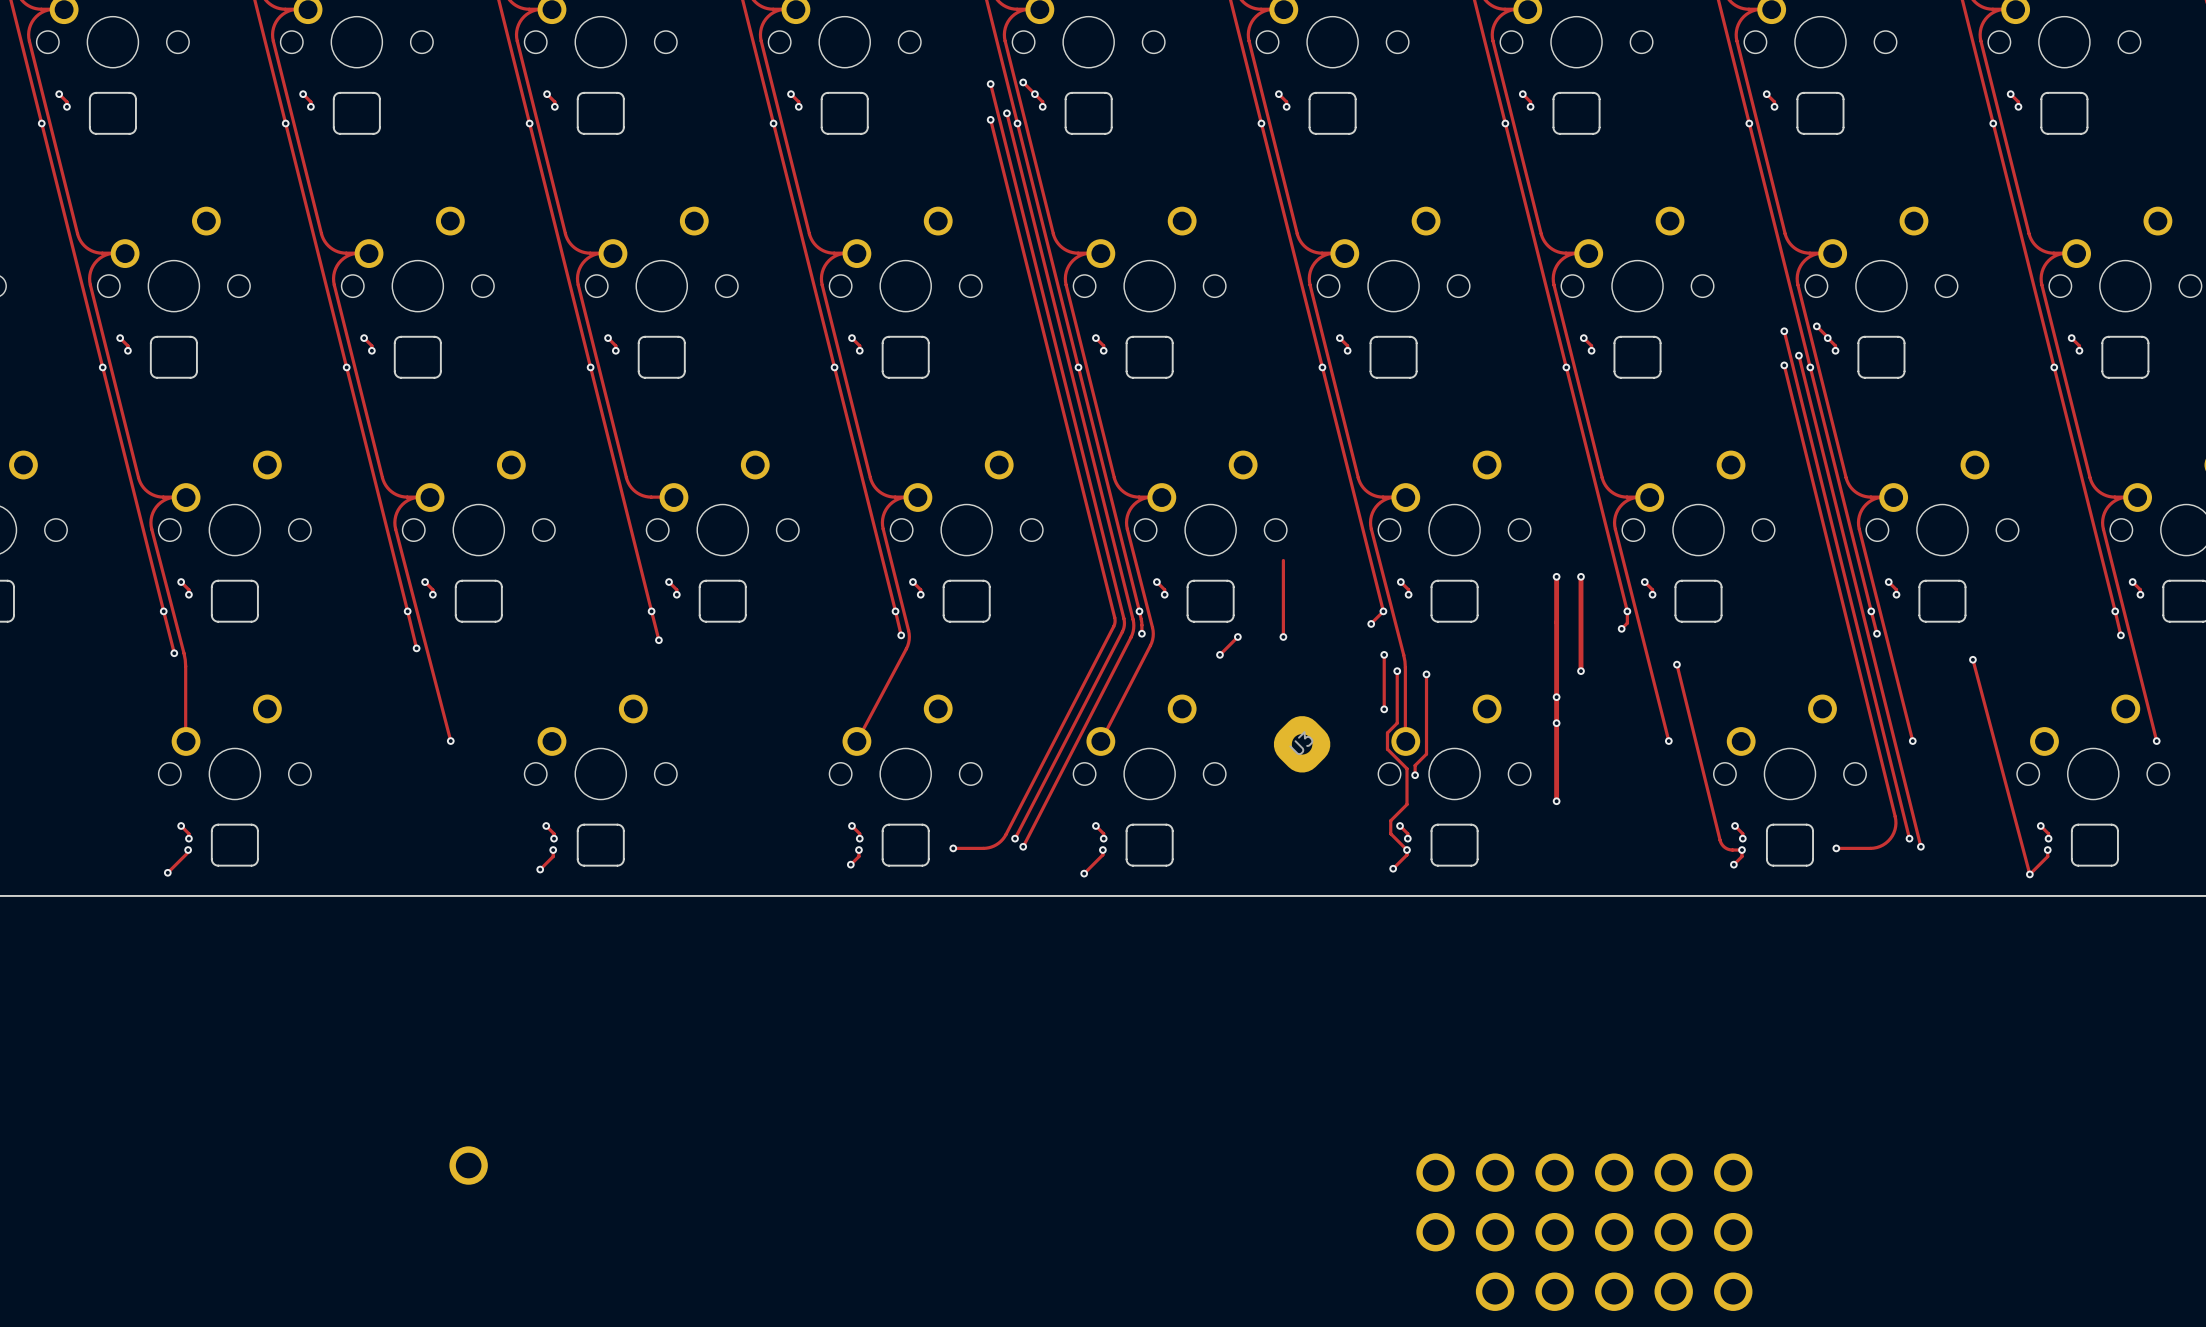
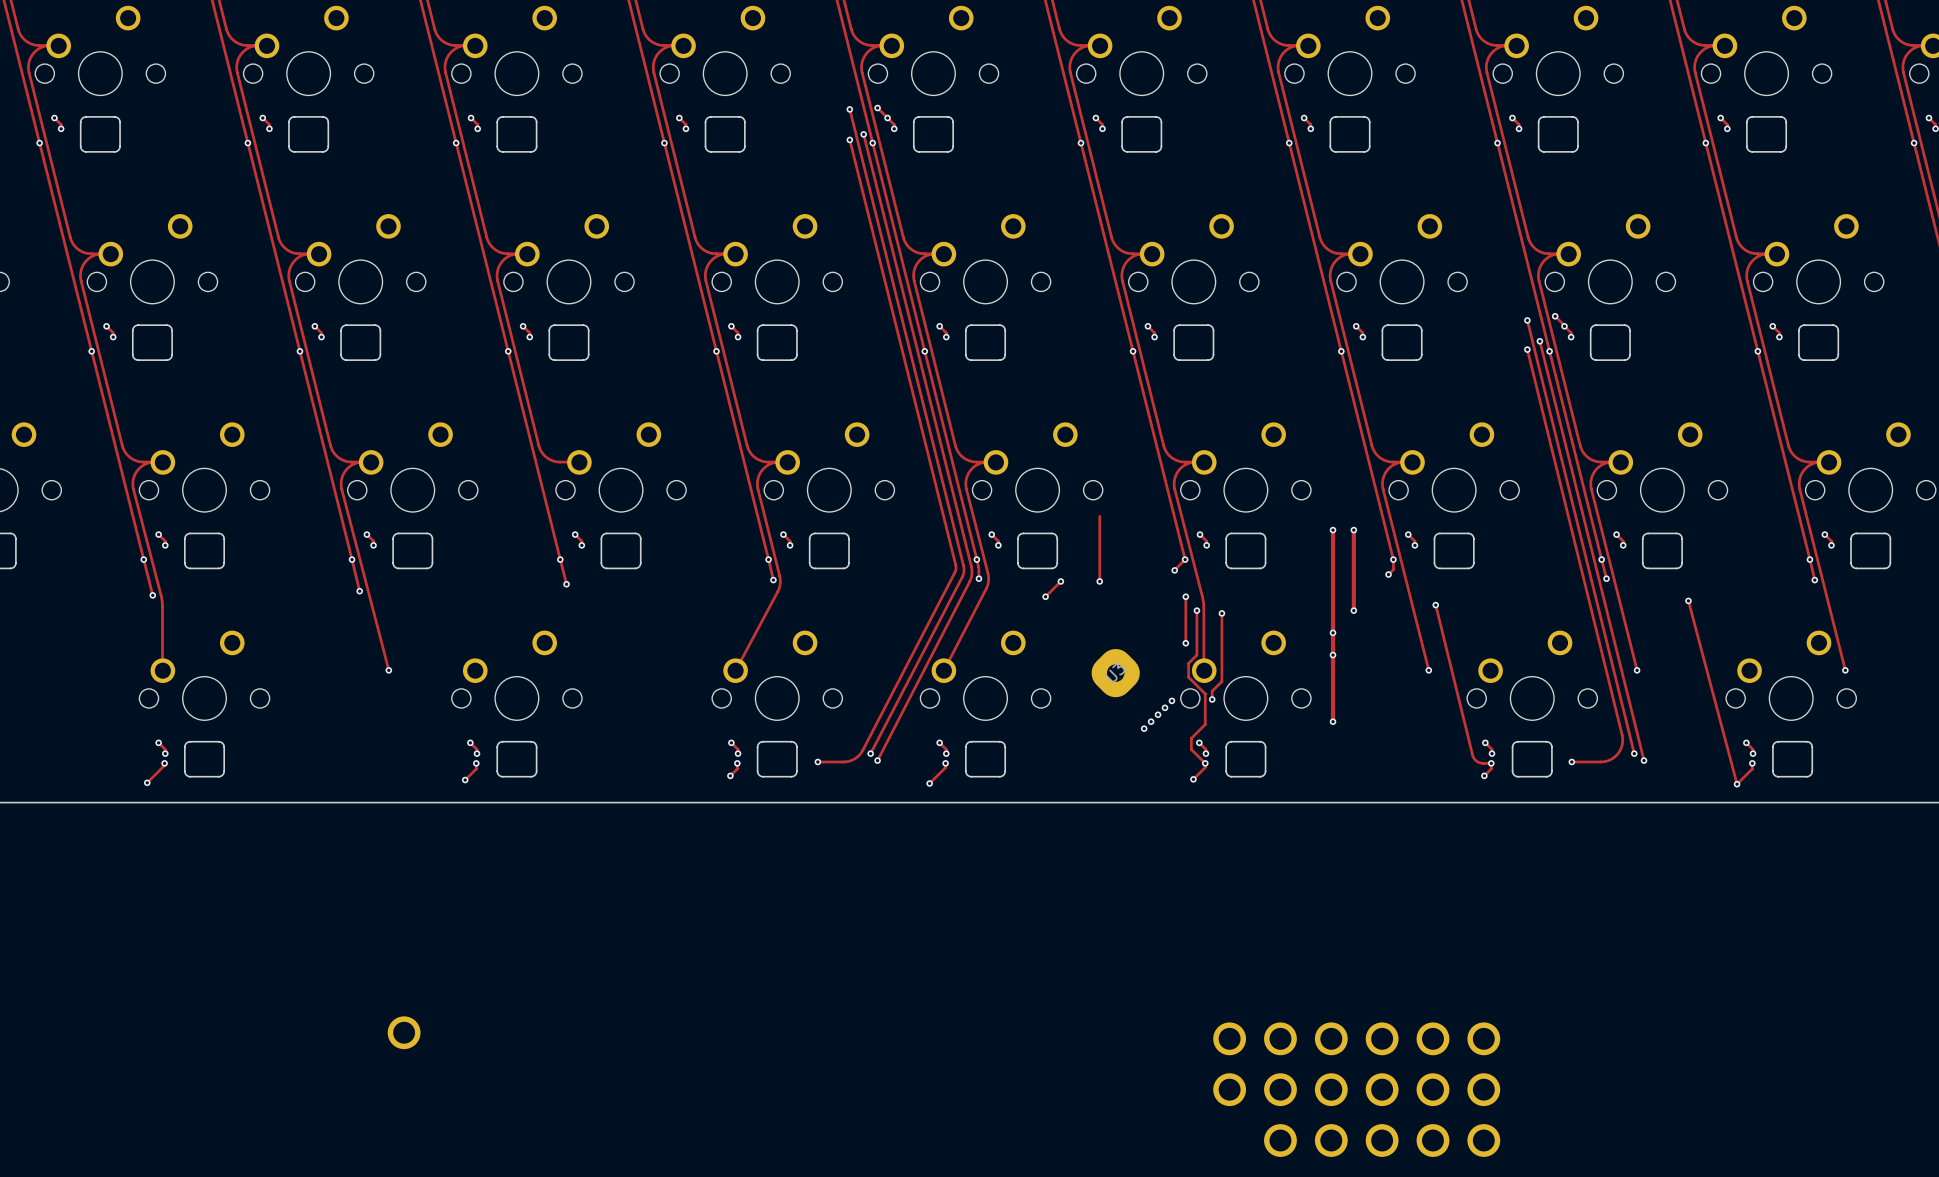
via: none -> (1171, 700)
via: none -> (1165, 707)
via: none -> (1158, 714)
via: none -> (1151, 721)
via: none -> (1144, 728)

